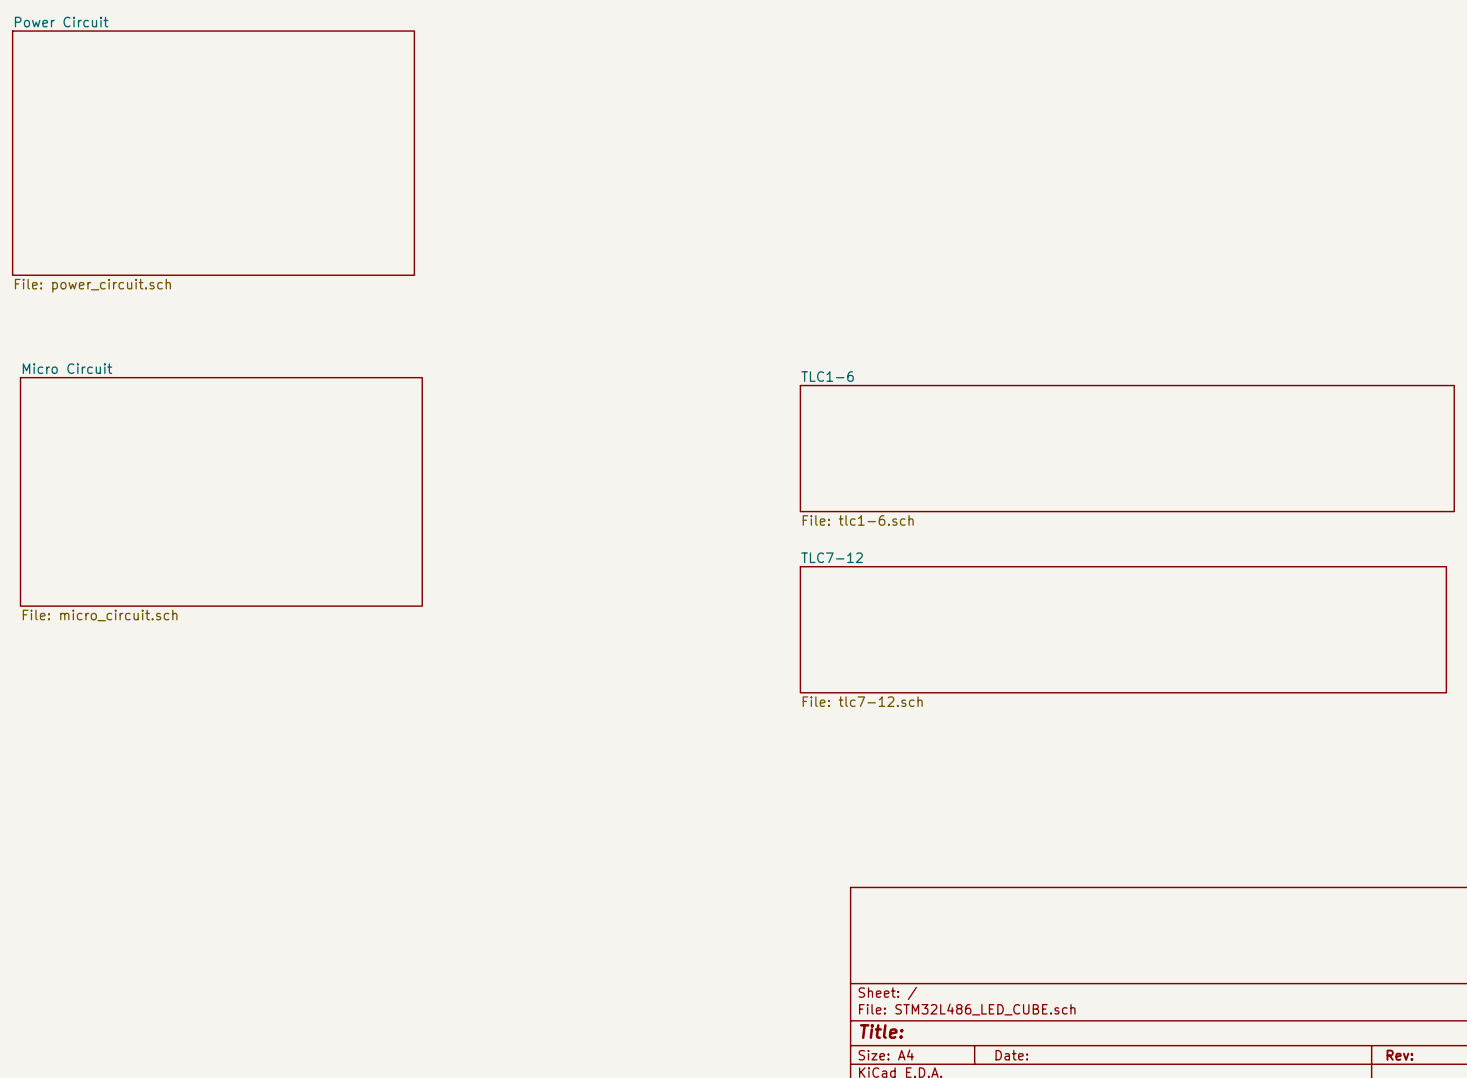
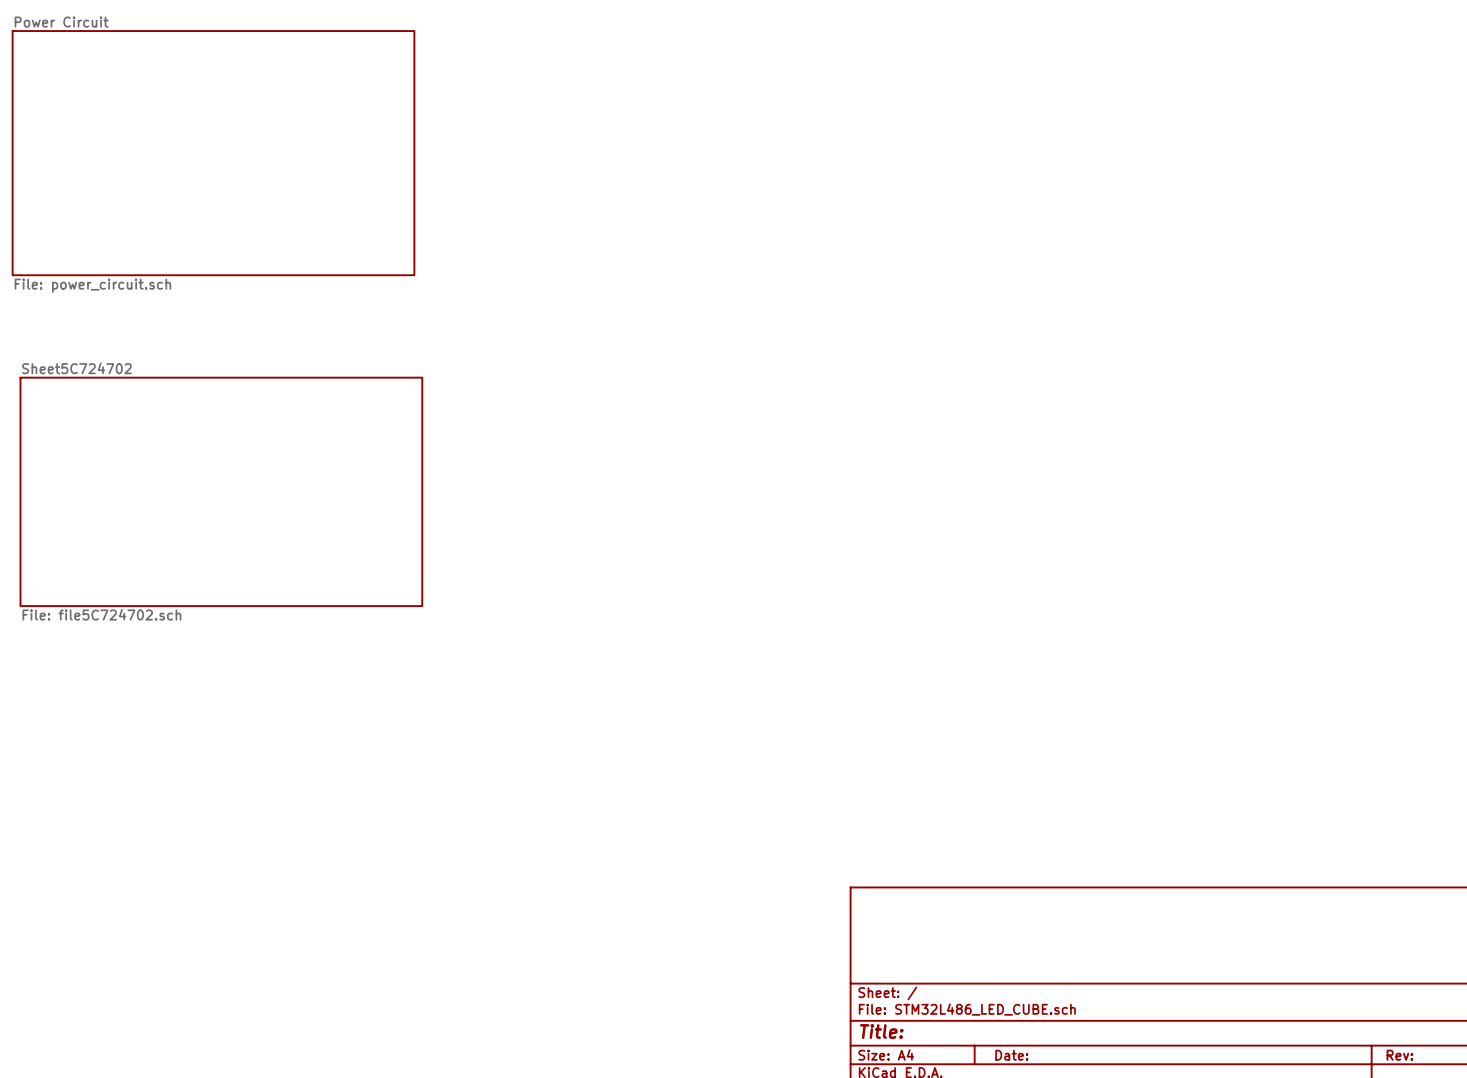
sheet Micro Circuit name: Micro Circuit (67, 368) -> Sheet5C724702 (76, 368)
sheet TLC1-6: File: tlc1-6.sch (1127, 448) -> none
sheet Micro Circuit value: File: micro_circuit.sch (100, 615) -> File: file5C724702.sch (101, 614)
sheet TLC7-12: File: tlc7-12.sch (1123, 629) -> none

